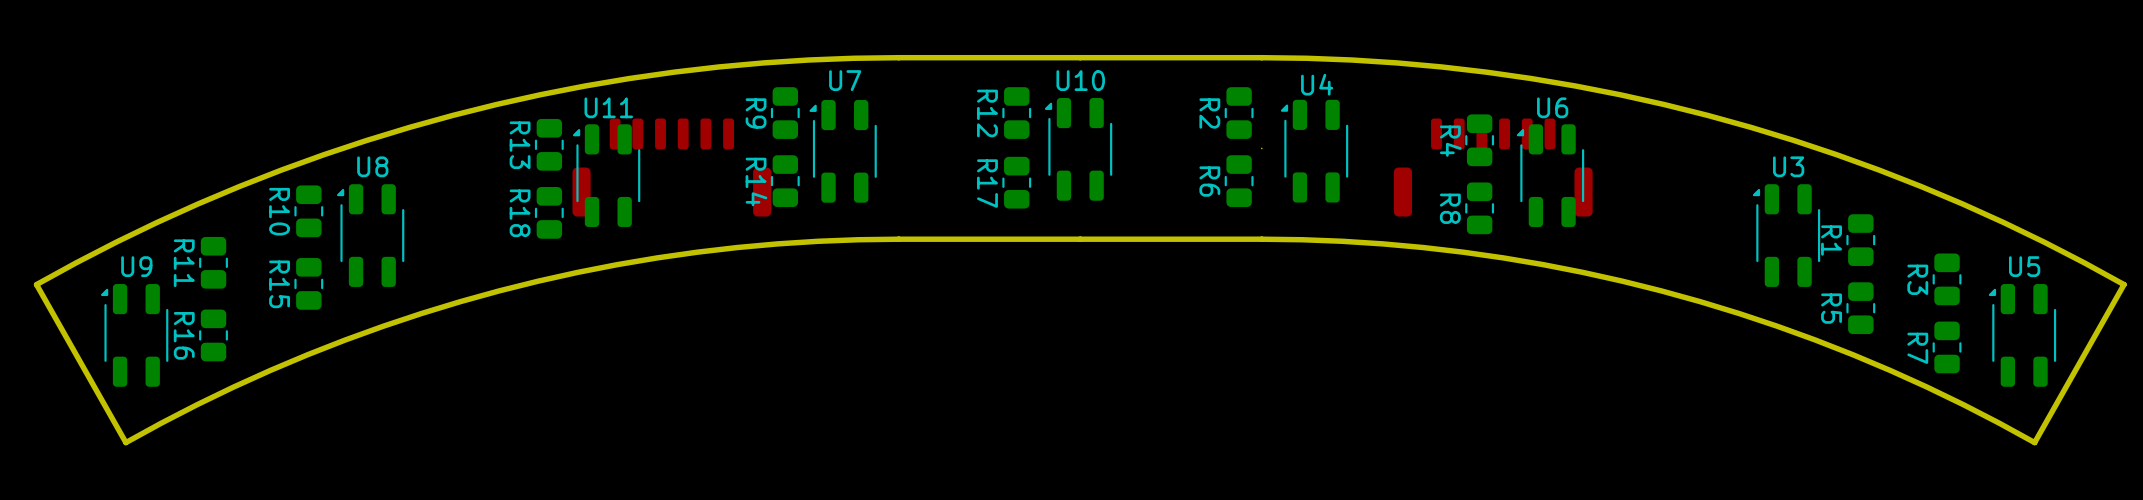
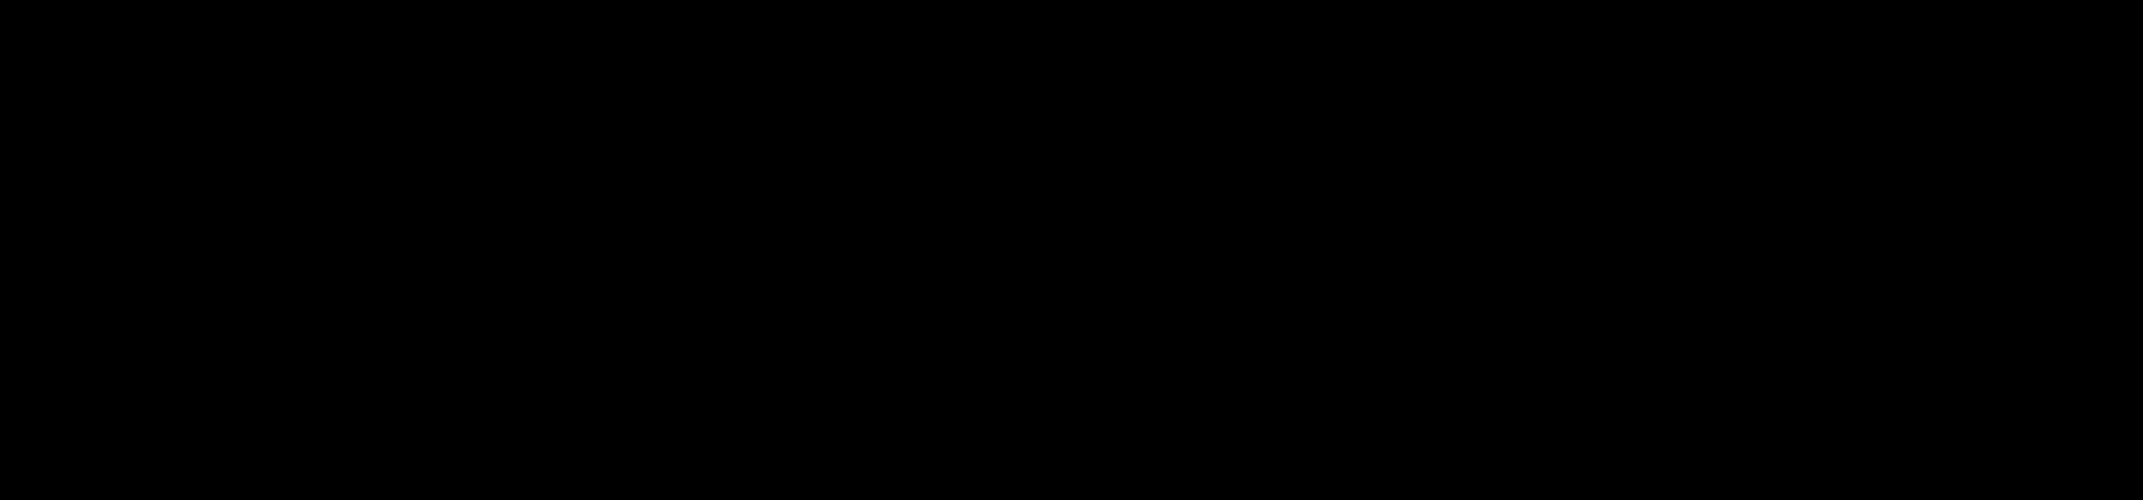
board edge: (1261, 57) (898, 57) (808, 60) (674, 72) (584, 86) (496, 104) (409, 127) (281, 170) (156, 222) (36, 284) (125, 442) (233, 387) (307, 354) (421, 313) (499, 290) (577, 272) (697, 252) (817, 241) (898, 239) (1261, 239) (1342, 241) (1463, 252) (1543, 264) (1661, 290) (1777, 326) (1852, 354) (1926, 387) (2034, 442) (2124, 284) (2003, 222) (1921, 186) (1836, 154) (1707, 115) (1575, 86) (1486, 72) (1351, 60) (1261, 57) -> none
R9: (785, 113) -> none
R12: (1016, 113) -> none
R2: (1239, 113) -> none
R4: (1479, 140) -> none
R13: (549, 144) -> none
U10: (1078, 149) -> none
U7: (843, 151) -> none
U4: (1314, 151) -> none
part: (671, 167) -> none
part: (1493, 167) -> none
U11: (606, 175) -> none
U6: (1550, 175) -> none
R14: (785, 181) -> none
R6: (1239, 181) -> none
R17: (1016, 182) -> none
R8: (1479, 208) -> none
R10: (308, 211) -> none
R18: (549, 212) -> none
U8: (370, 235) -> none
U3: (1786, 235) -> none
R1: (1860, 240) -> none
R11: (213, 262) -> none
R3: (1947, 279) -> none
R15: (308, 283) -> none
R5: (1860, 308) -> none
U9: (134, 335) -> none
R16: (213, 335) -> none
U5: (2022, 335) -> none
R7: (1947, 347) -> none

